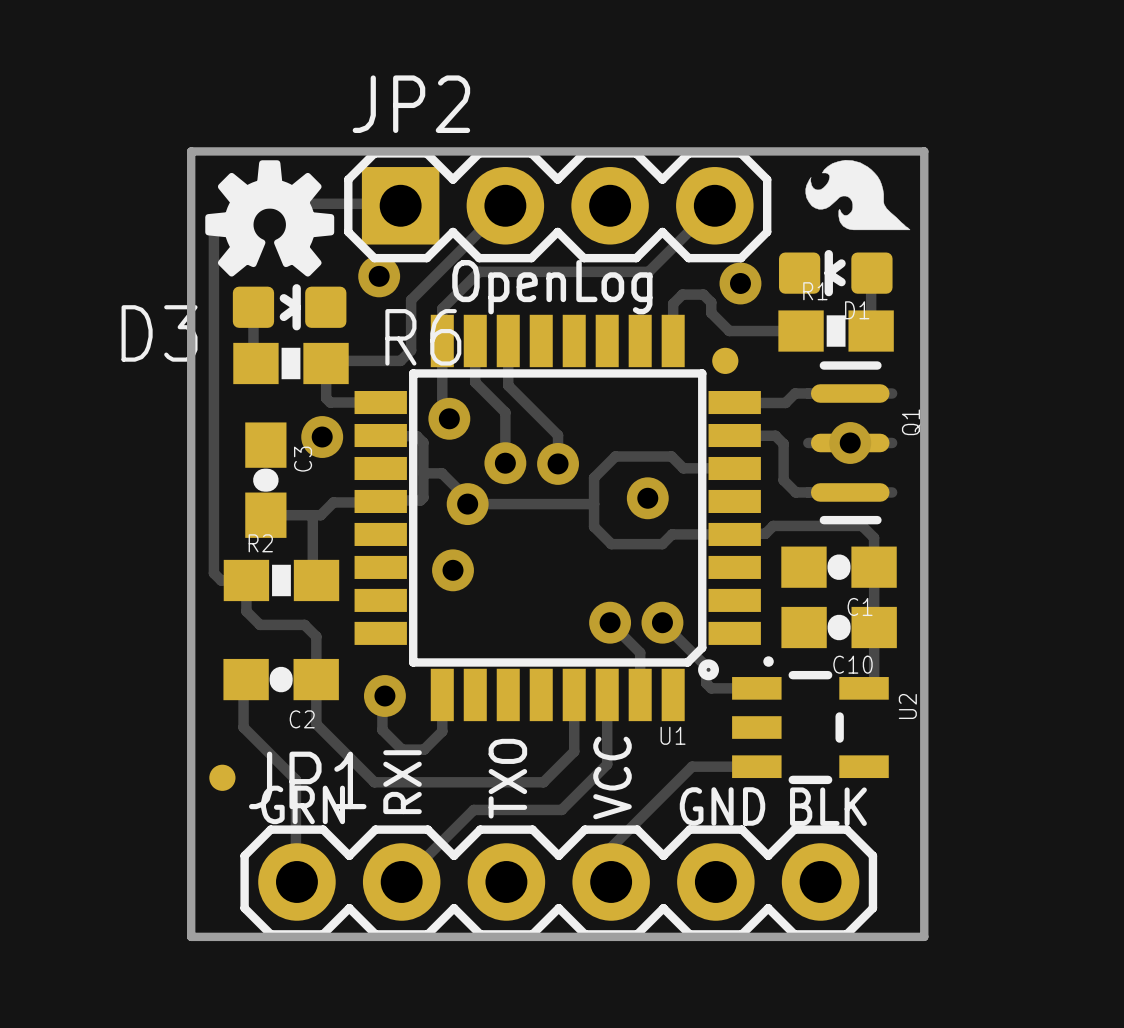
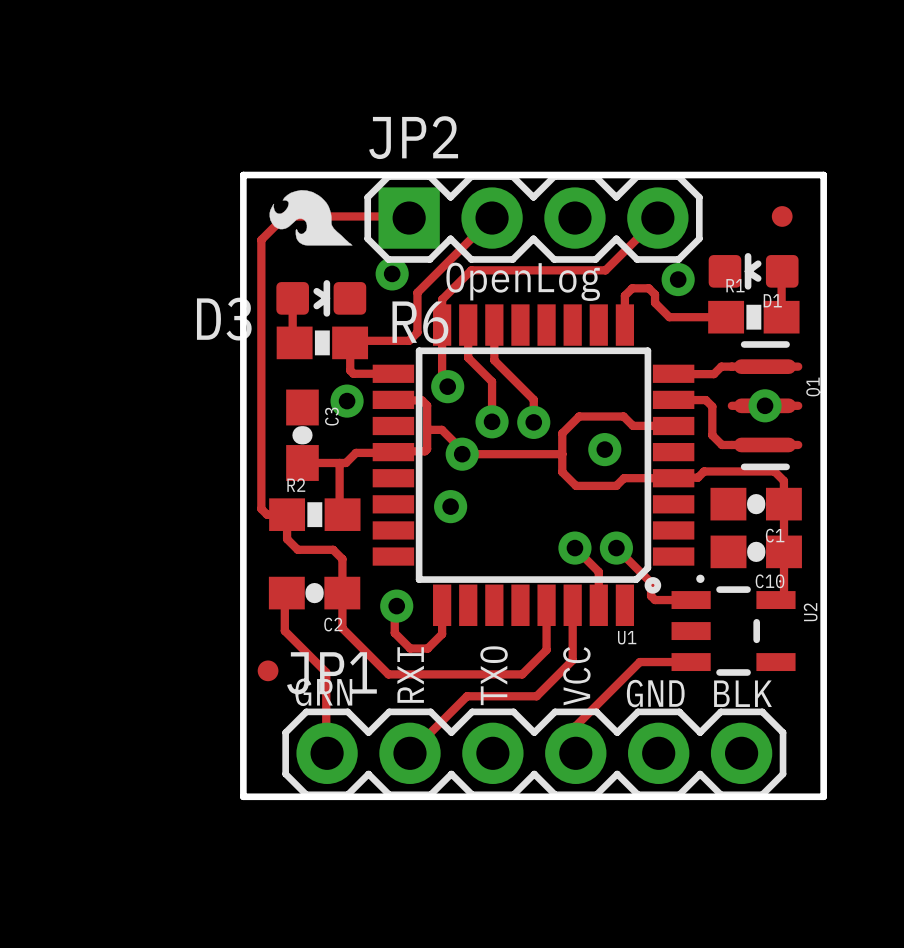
drawing: [205, 160, 335, 277] -> none
drawing position: (857, 195) -> (311, 217)
part position: (725, 360) -> (782, 216)

